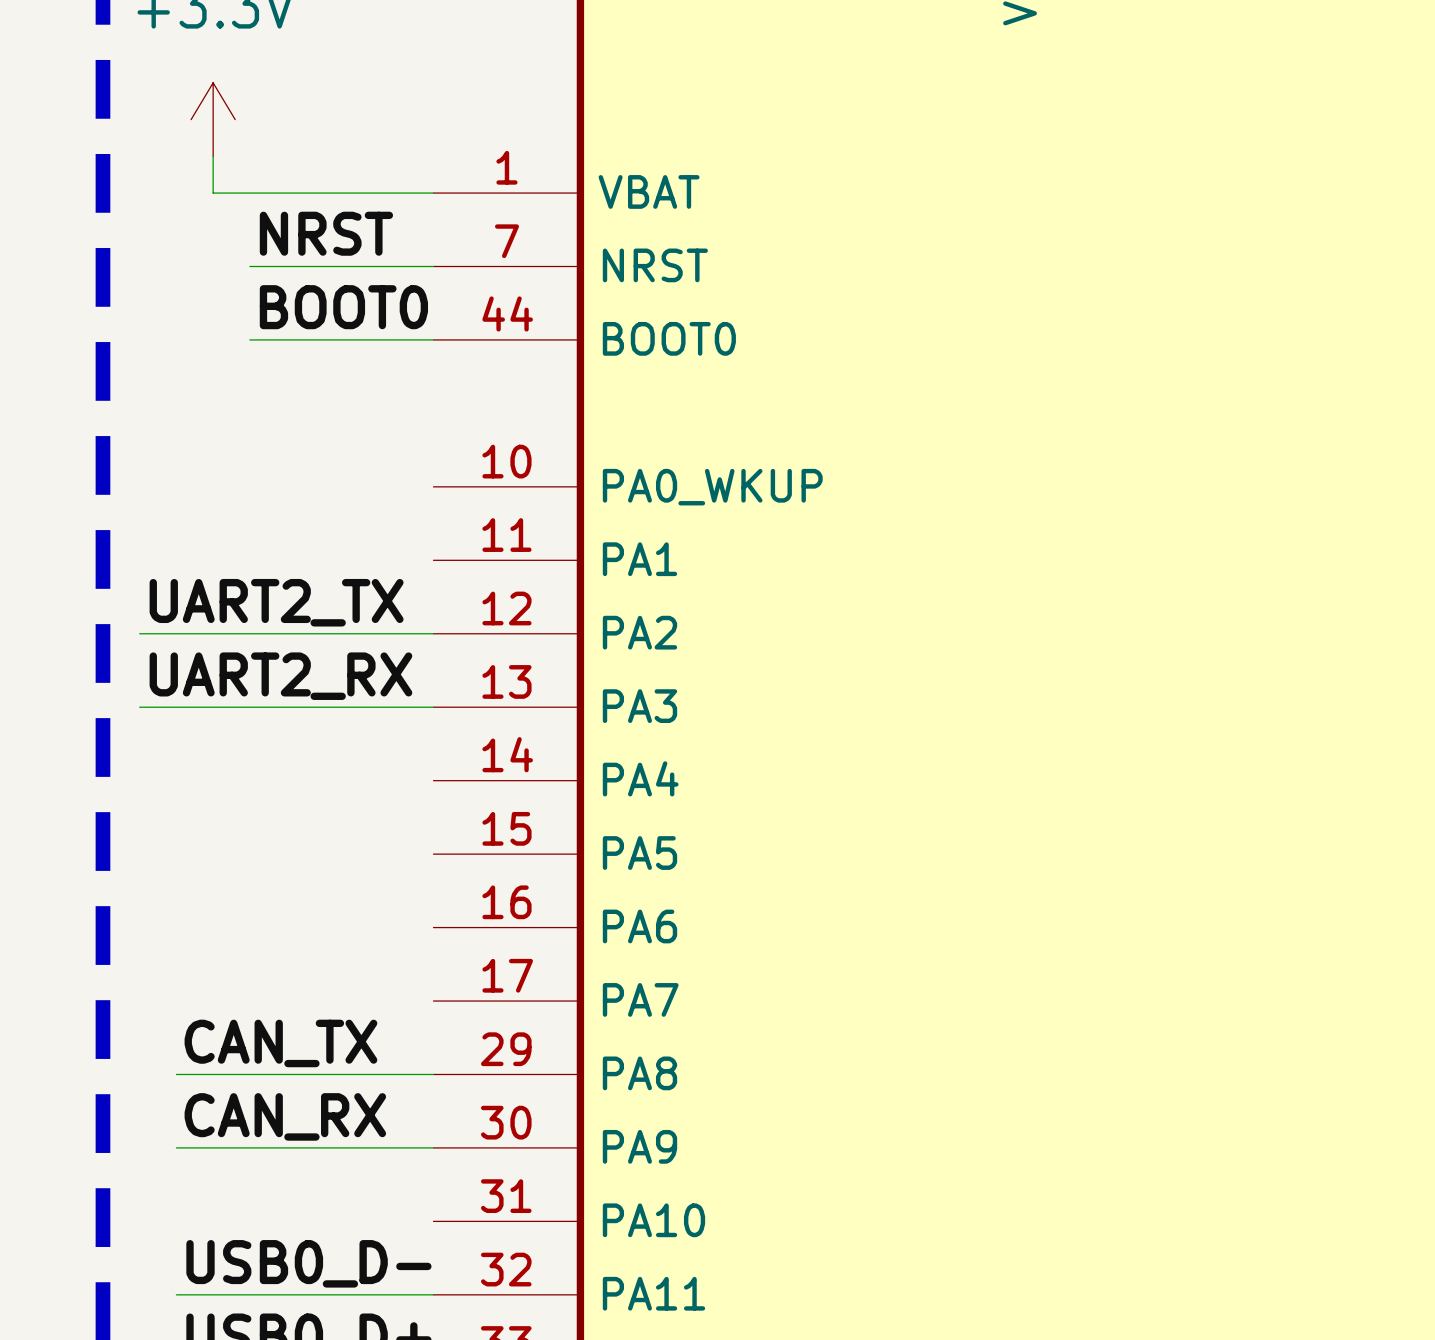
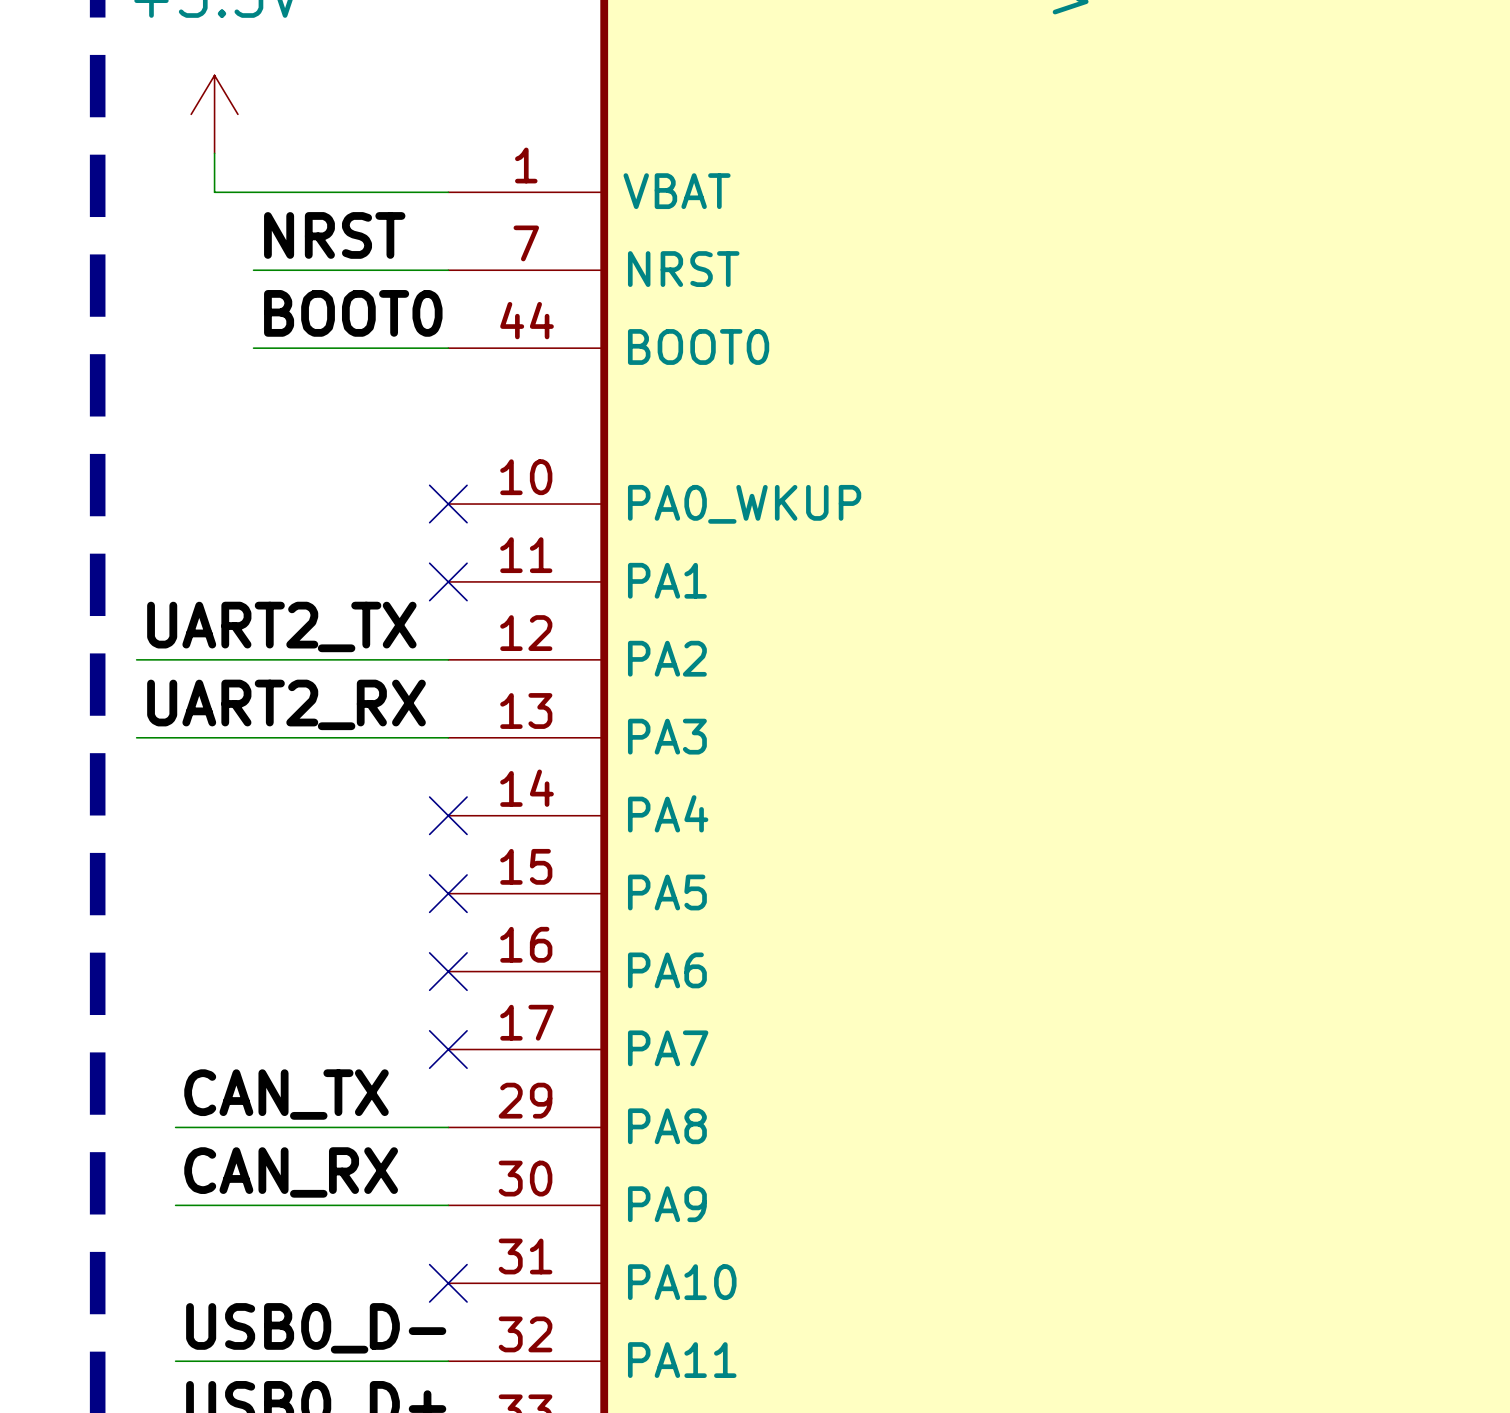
no-connect mark: none -> (448, 504)
no-connect mark: none -> (448, 581)
no-connect mark: none -> (448, 815)
no-connect mark: none -> (448, 893)
no-connect mark: none -> (448, 971)
no-connect mark: none -> (448, 1049)
no-connect mark: none -> (448, 1283)

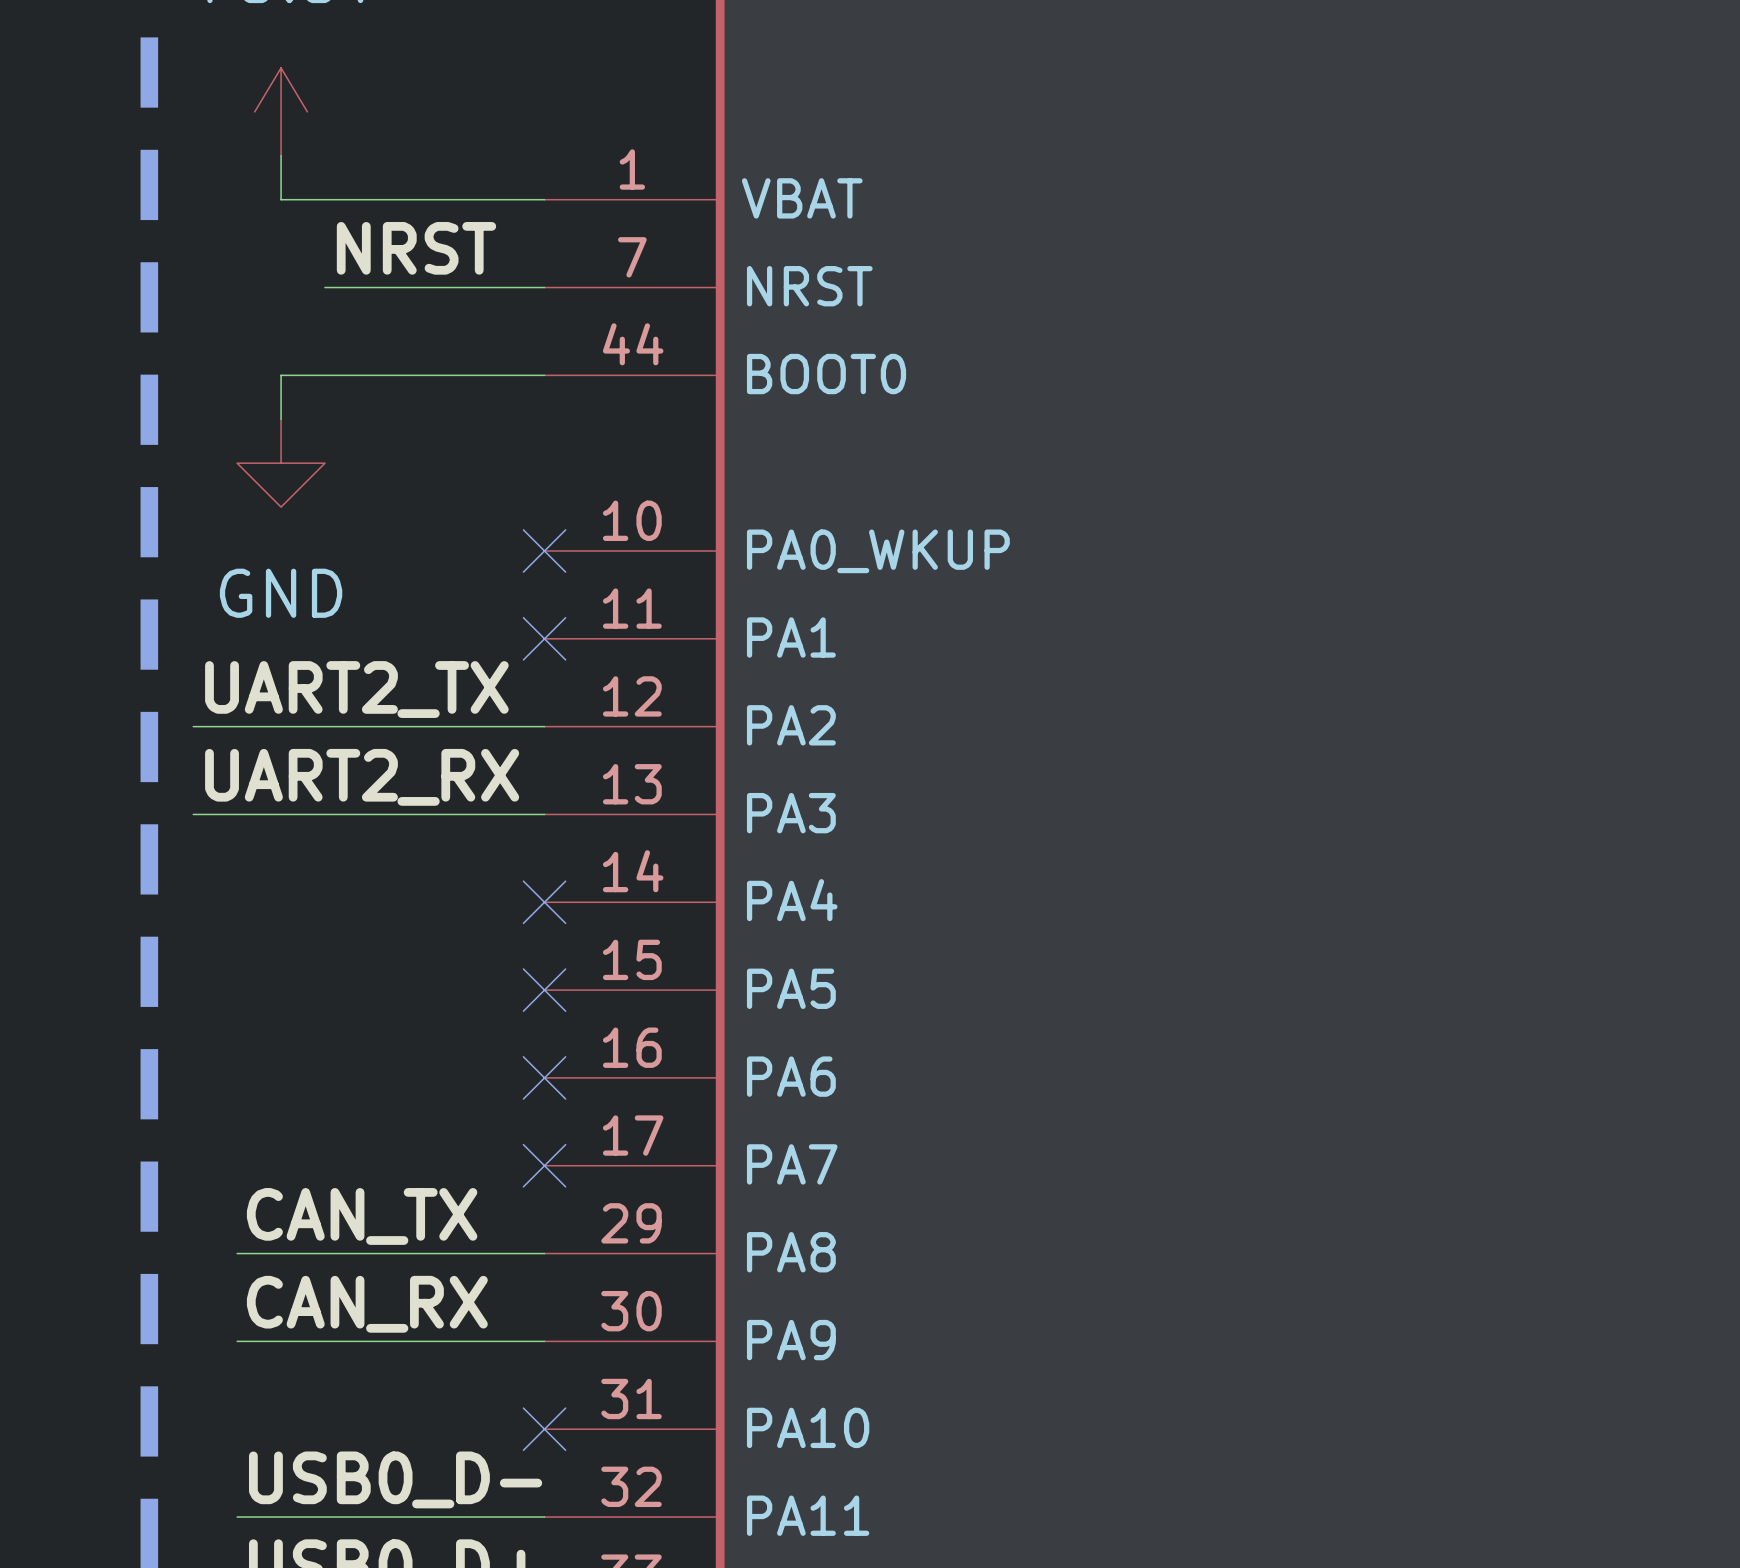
label: BOOT0 (353, 313) -> none
wire: none -> (324, 375) (281, 375) (281, 419)
power symbol: none -> GND (281, 463)

